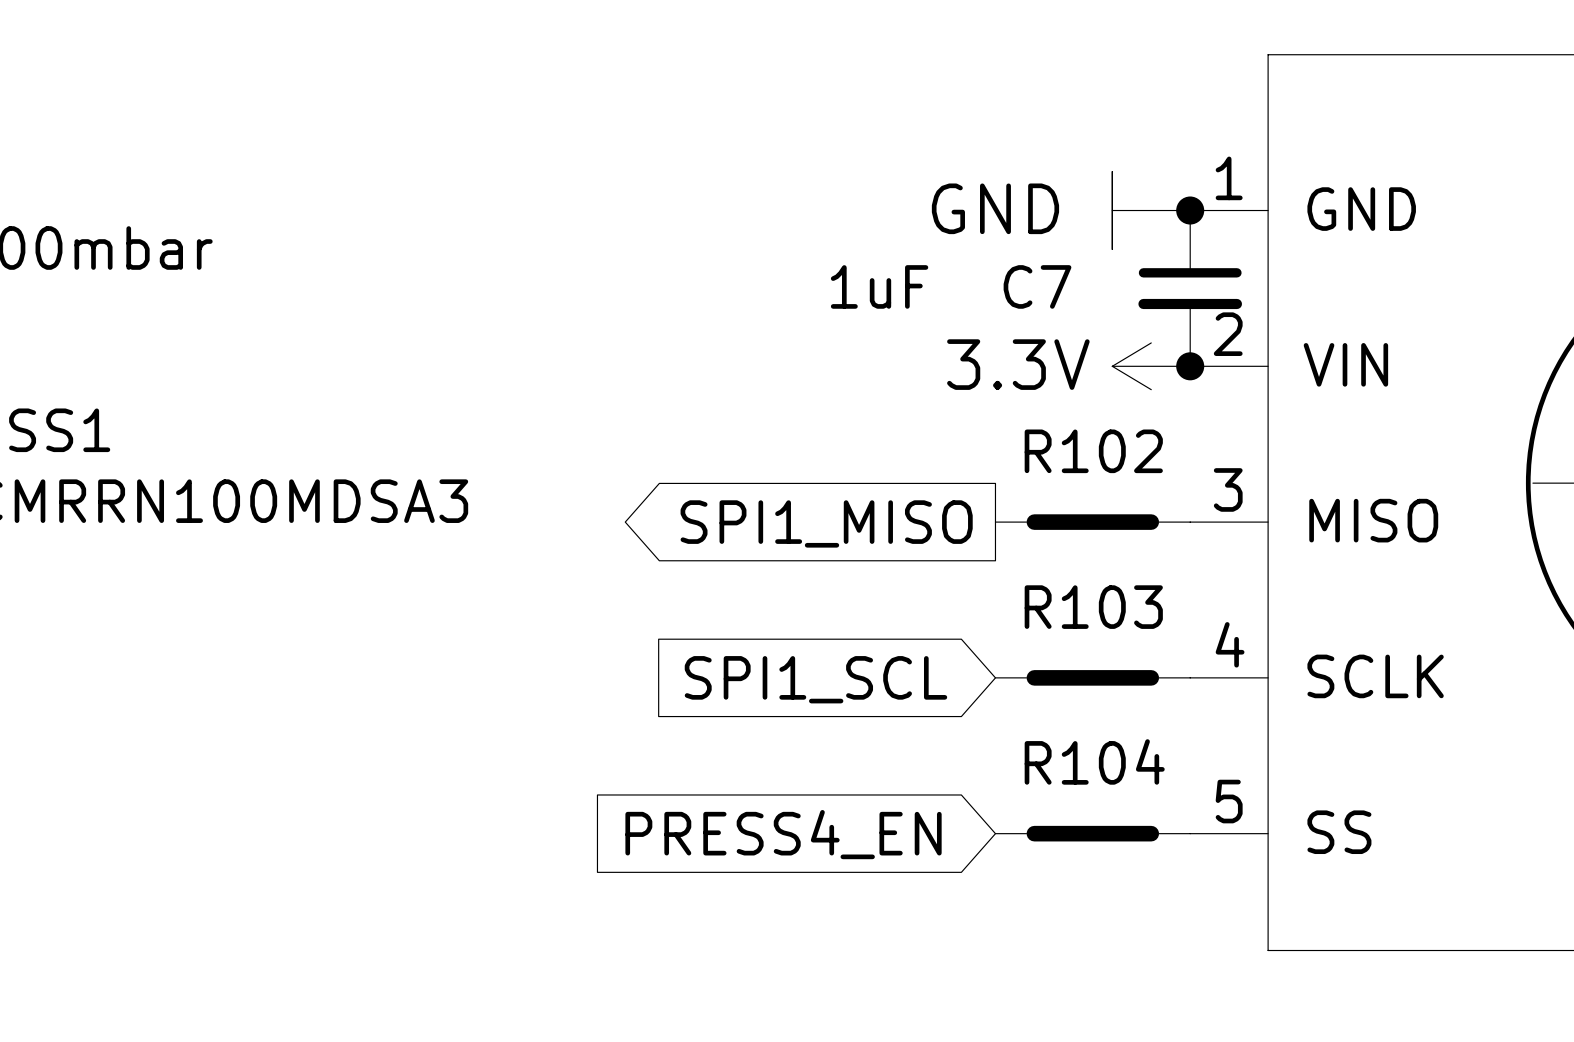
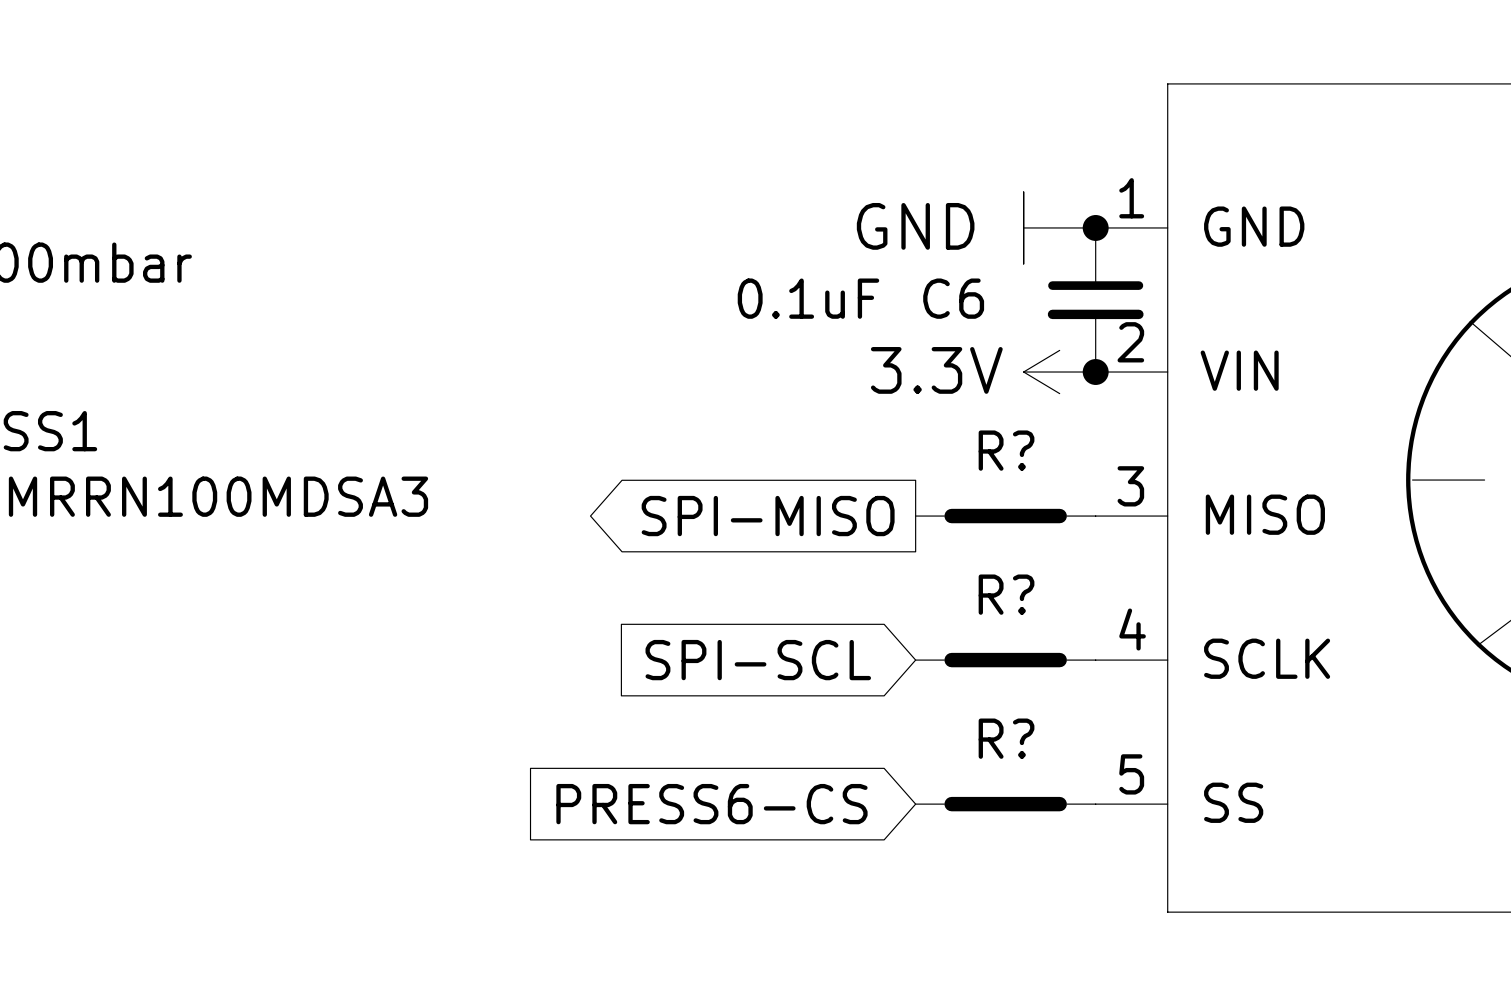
C7 text: 1uF (879, 286) -> 0.1uF (808, 298)
C7 name: C7 (1037, 286) -> C6 (953, 298)
R102 name: R102 (1093, 451) -> R? (1006, 450)
global label: SPI1_MISO (826, 523) -> SPI-MISO (768, 516)
R103 name: R103 (1093, 607) -> R? (1006, 594)
global label: SPI1_SCL (815, 679) -> SPI-SCL (758, 660)
R104 name: R104 (1094, 761) -> R? (1006, 738)
global label: PRESS4_EN (783, 834) -> PRESS6-CS (711, 804)

